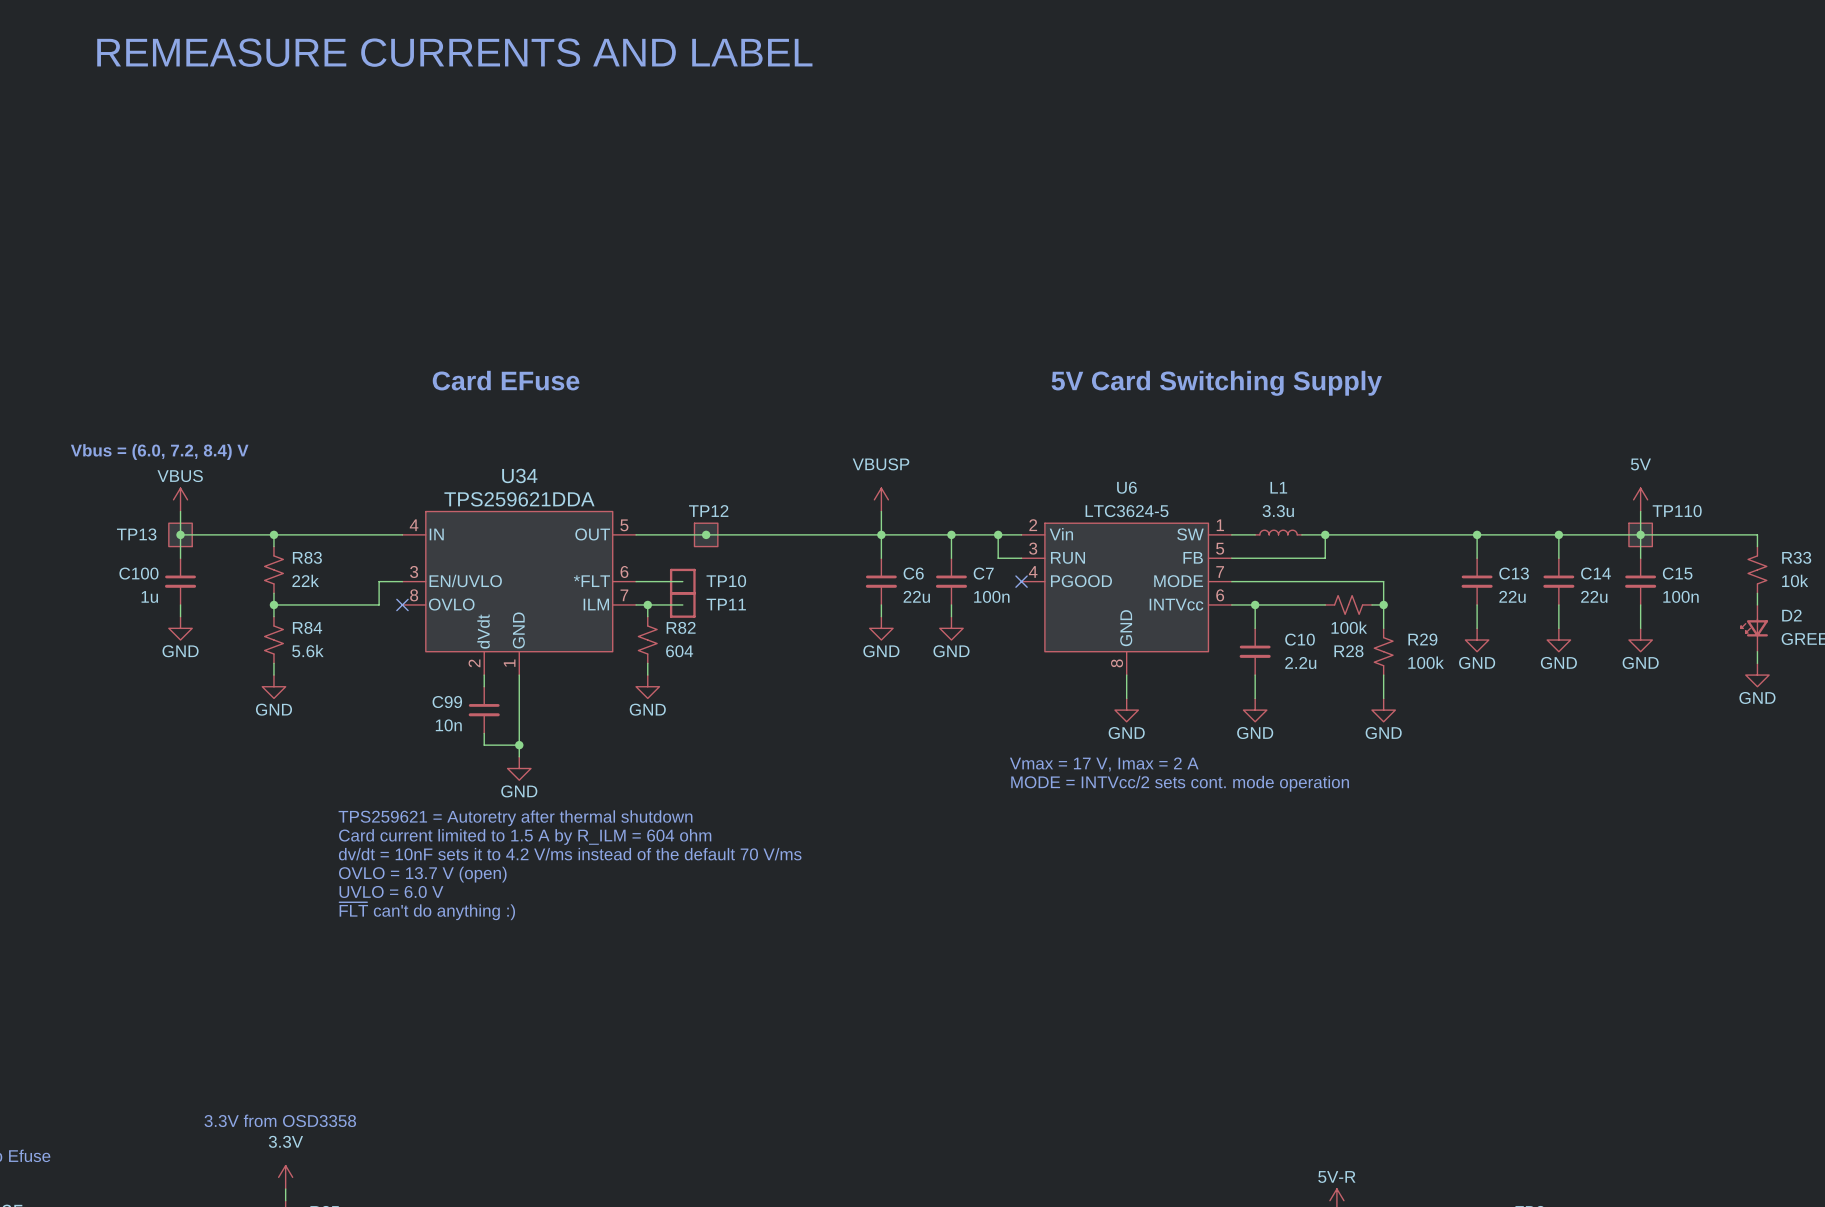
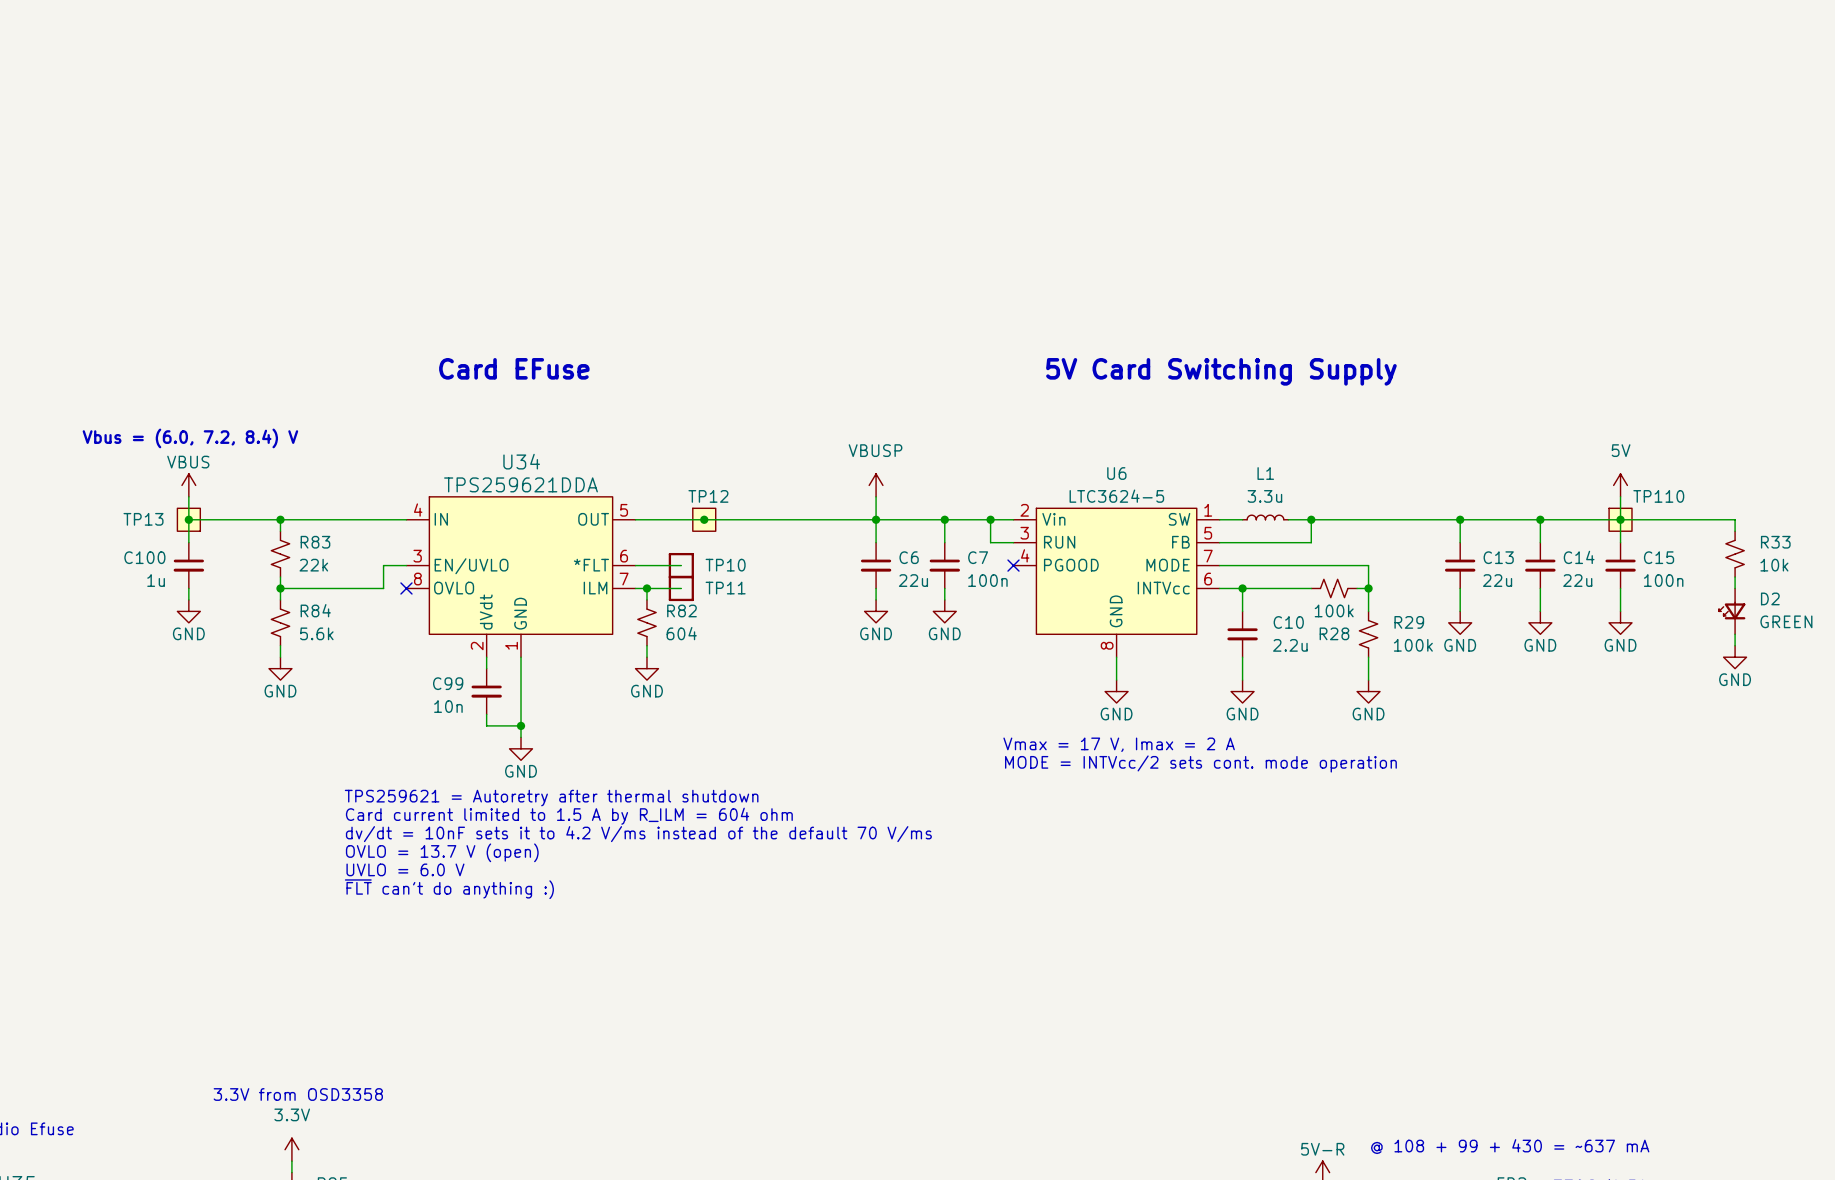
text: REMEASURE CURRENTS AND LABEL (454, 52) -> none
text: none -> @ 108 + 99 + 430 = ~637 mA (1510, 1146)

